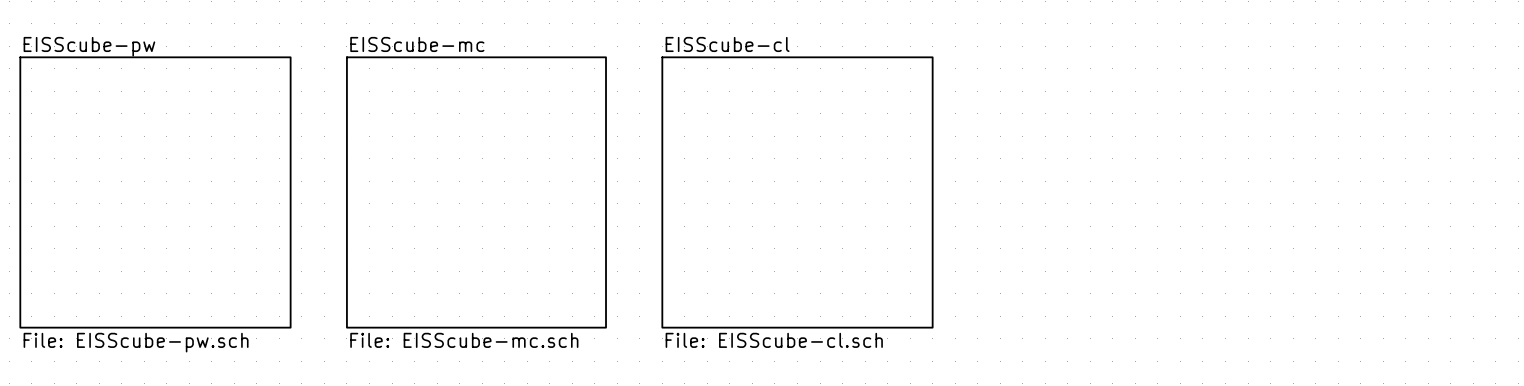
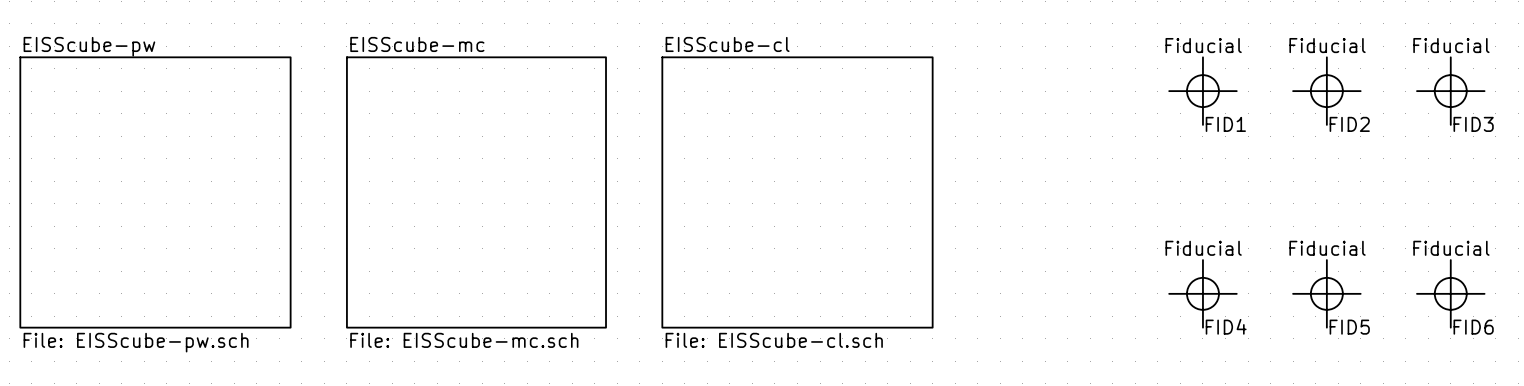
FID1: none -> Fiducial (1202, 91)
FID2: none -> Fiducial (1326, 91)
FID3: none -> Fiducial (1450, 91)
FID4: none -> Fiducial (1202, 293)
FID5: none -> Fiducial (1326, 293)
FID6: none -> Fiducial (1450, 293)

